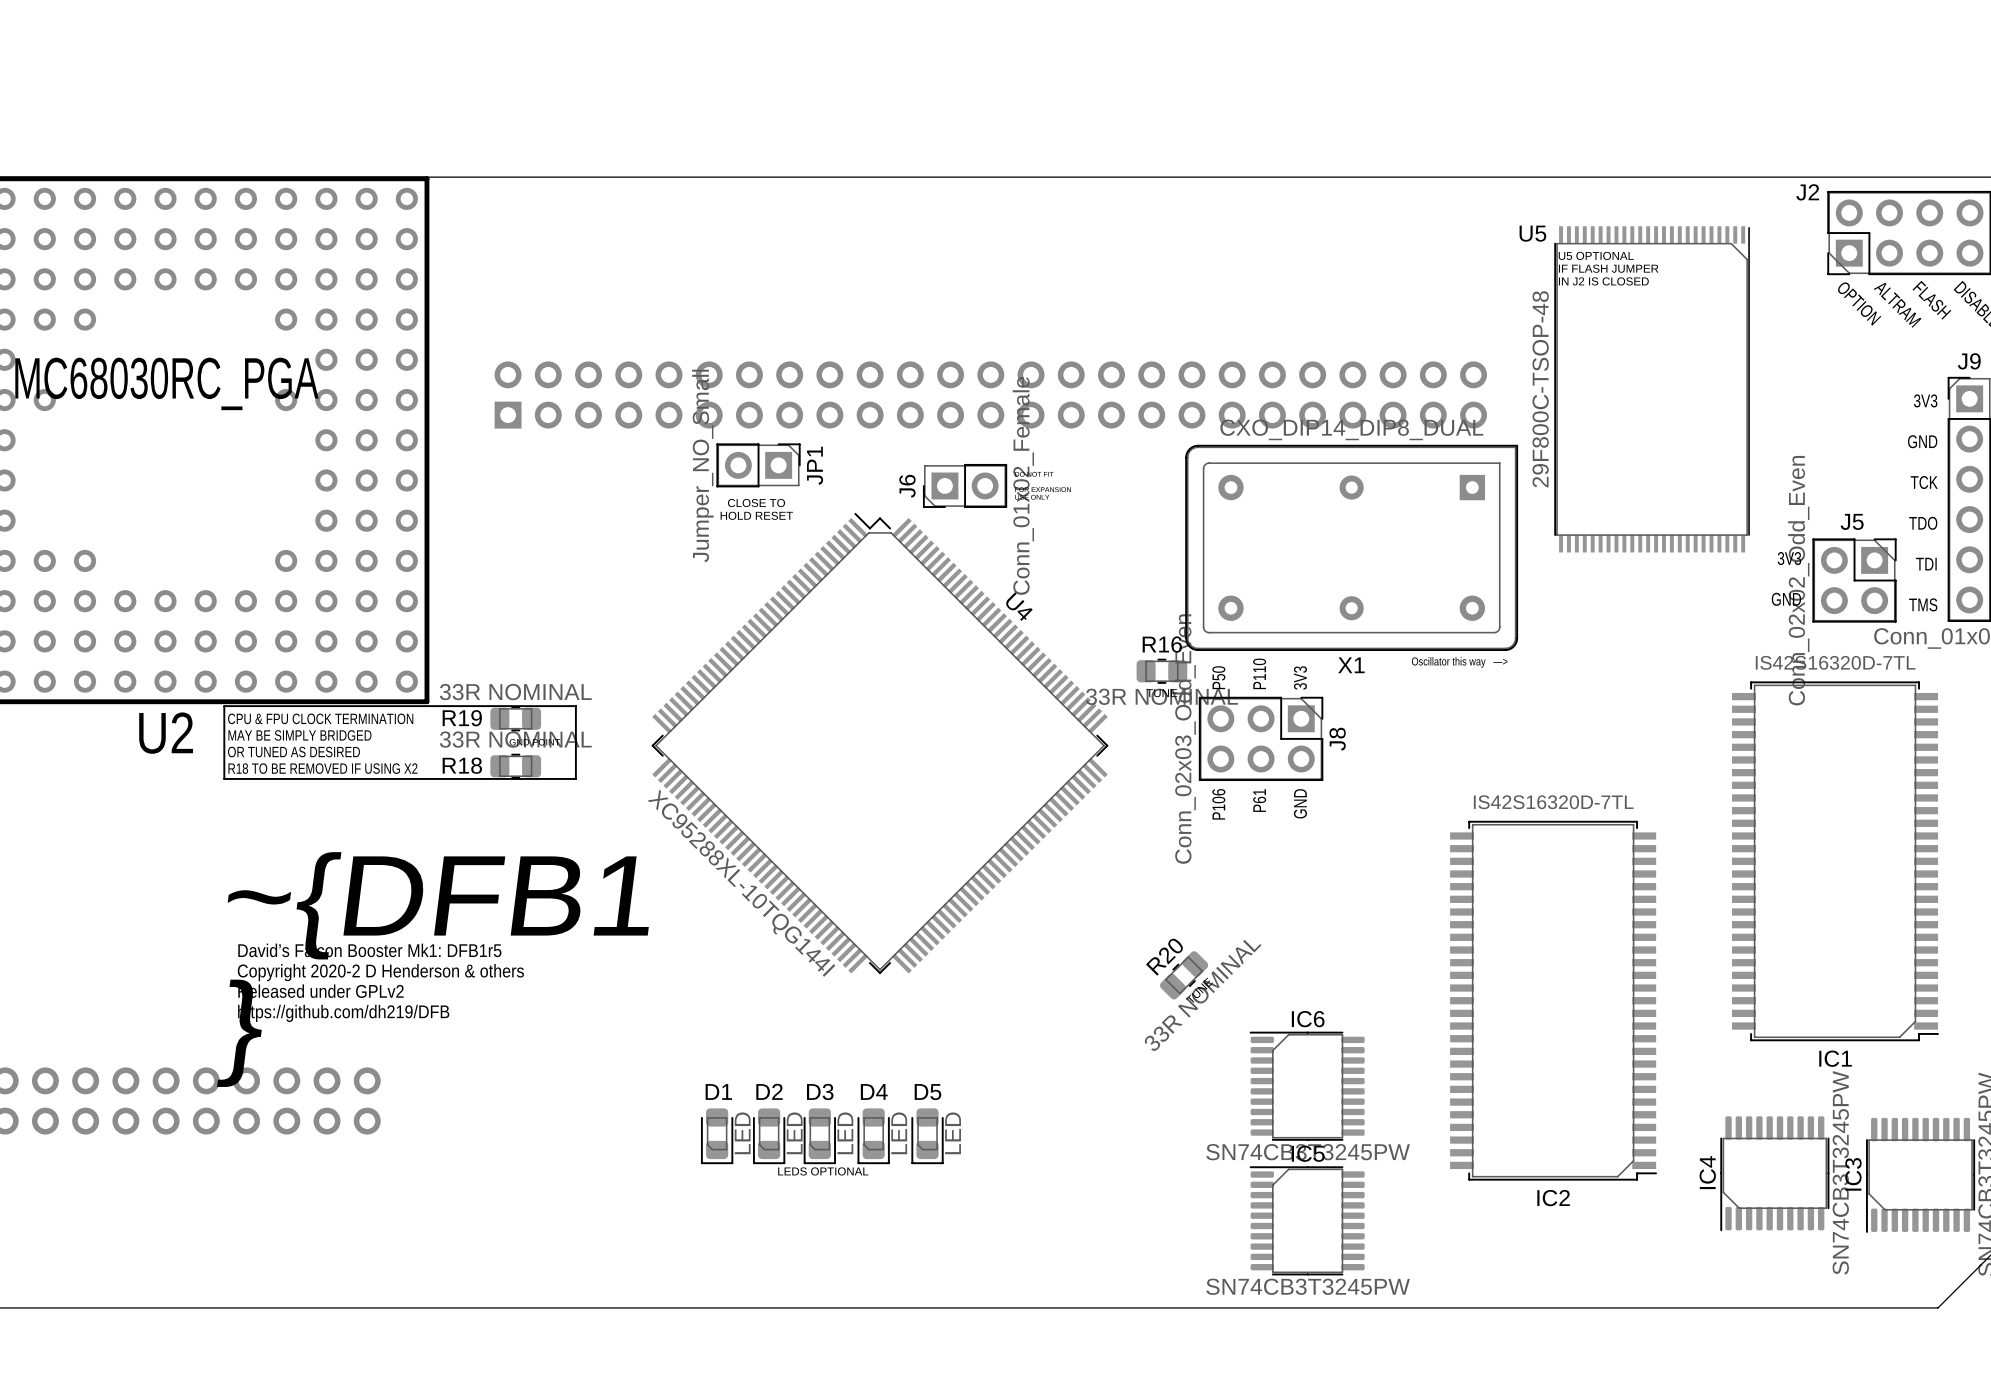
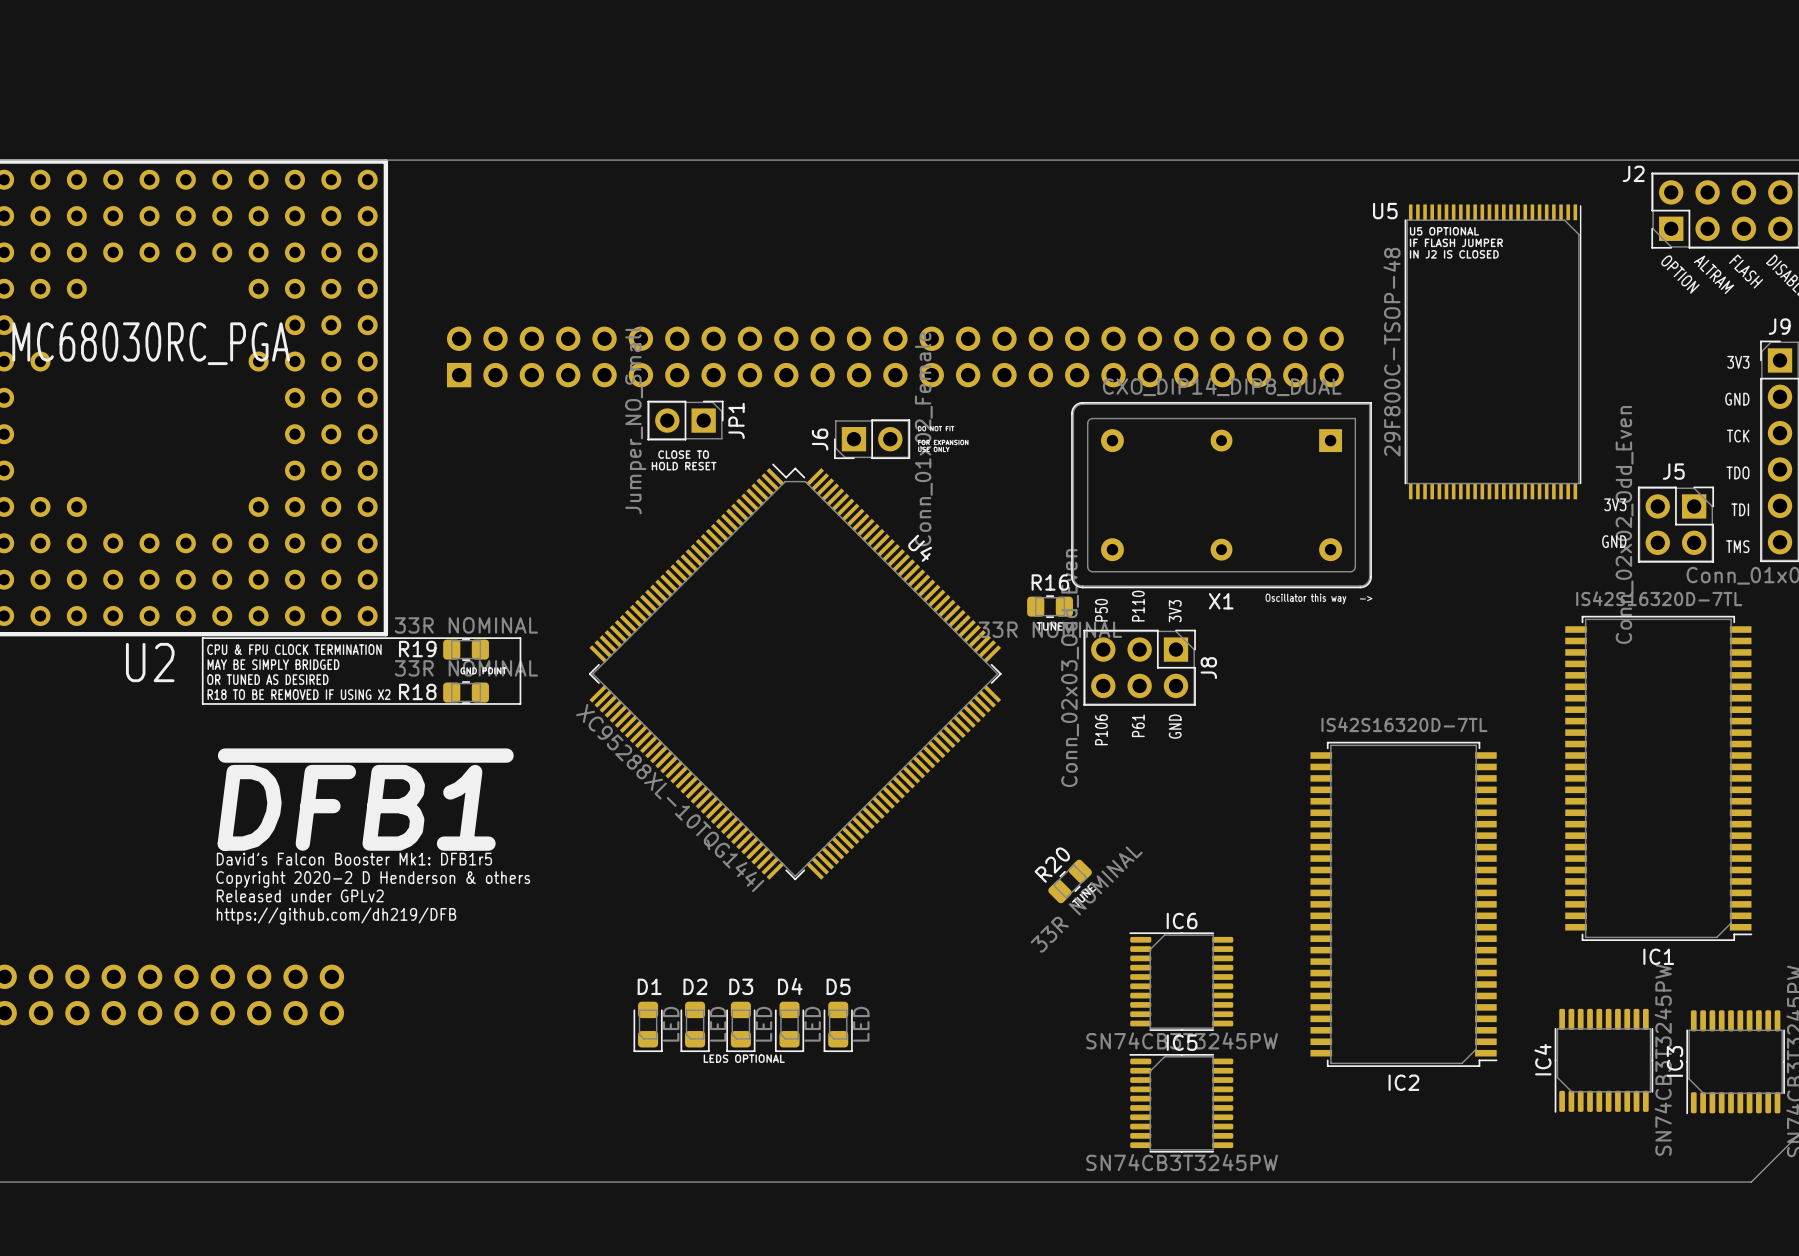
text: ~{DFB1 (438, 905) -> ~{DFB1} (365, 799)
text: } (239, 1033) -> none

